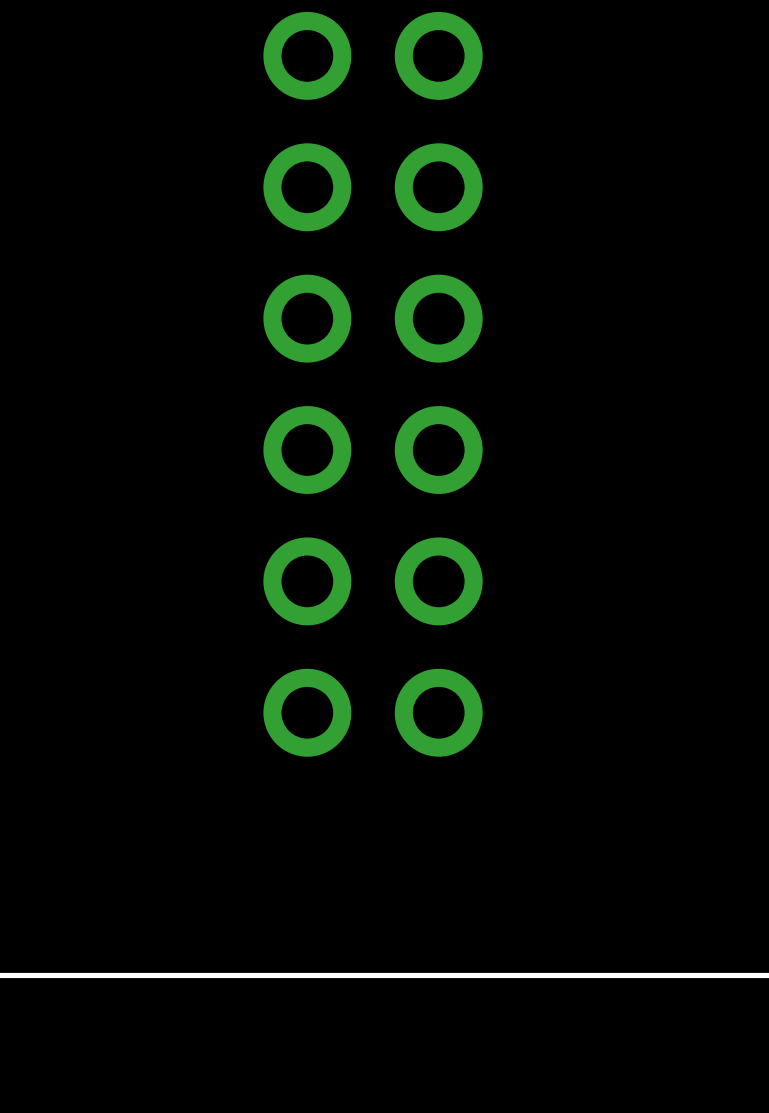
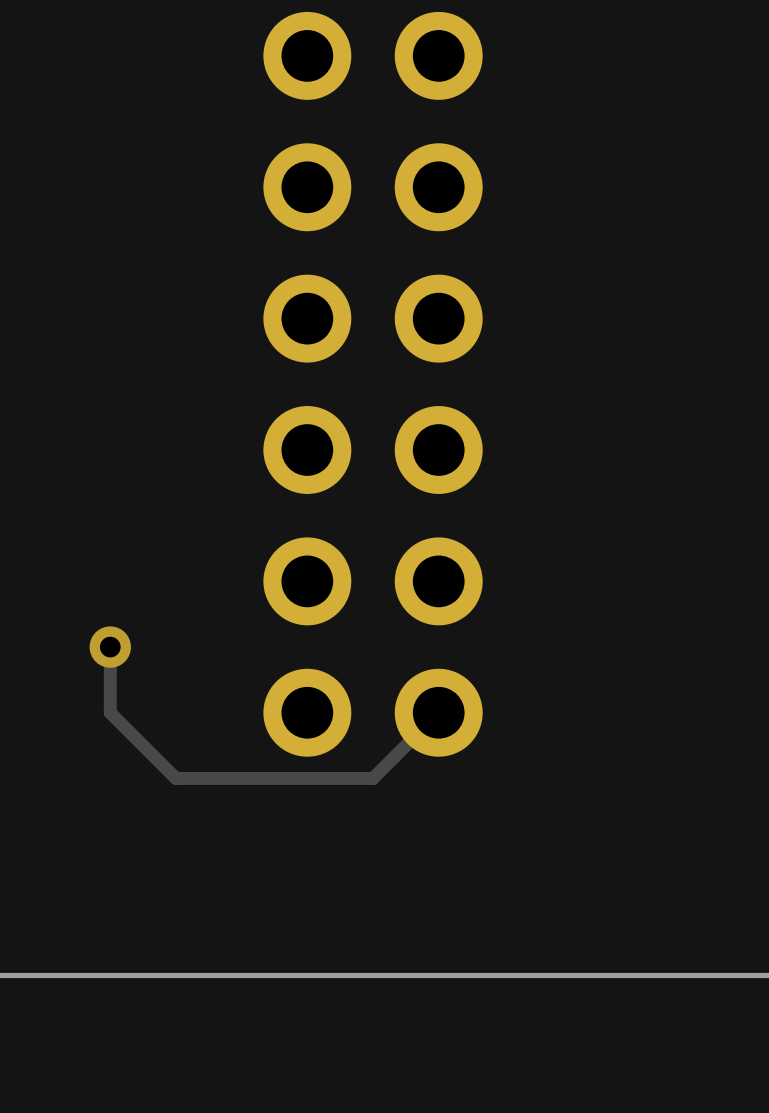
track: none -> (110, 647) (110, 712) (175, 778) (373, 778) (438, 712)
via: none -> (110, 647)

